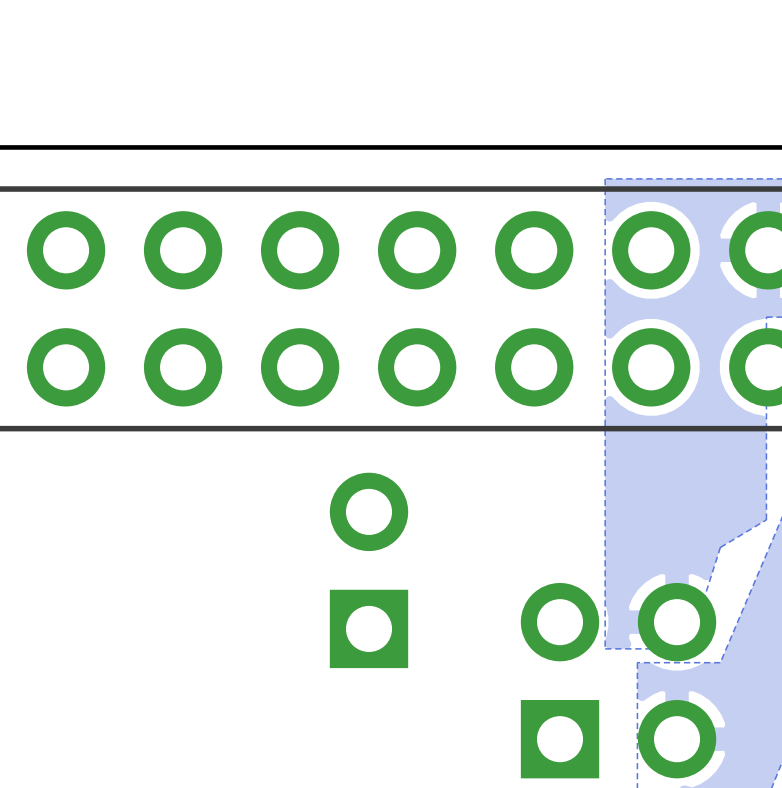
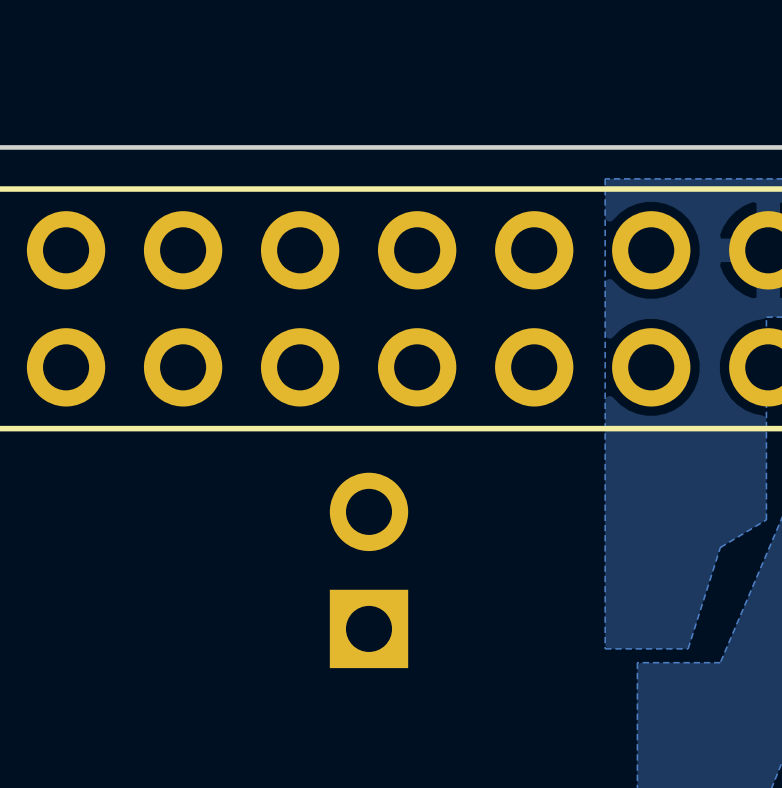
part: (618, 680) -> none

